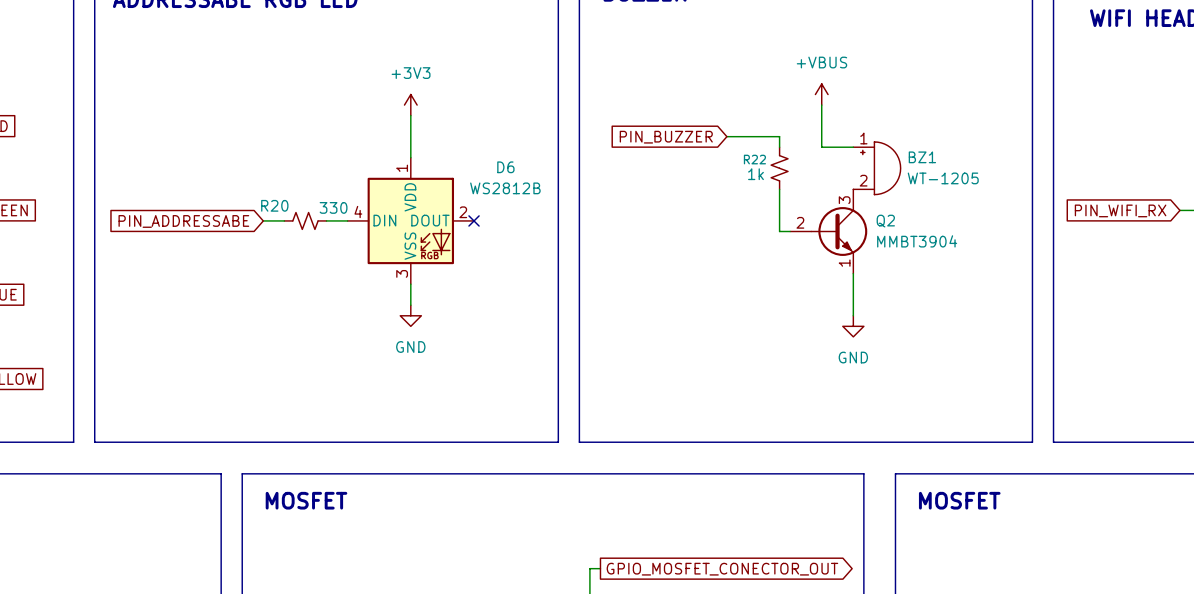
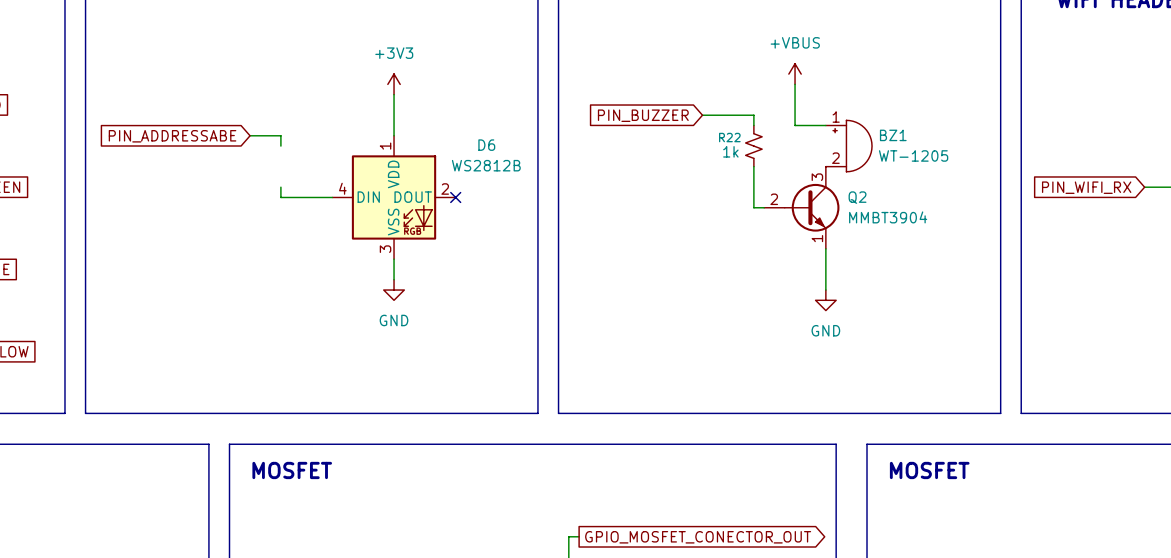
wire: none -> (250, 135) (280, 135) (280, 146)
wire: none -> (280, 187) (280, 197) (311, 197)
wire: (263, 220) (284, 220) -> none
R20: 330 (305, 220) -> none
global label position: PIN_ADDRESSABE (183, 221) -> PIN_ADDRESSABE (172, 136)

